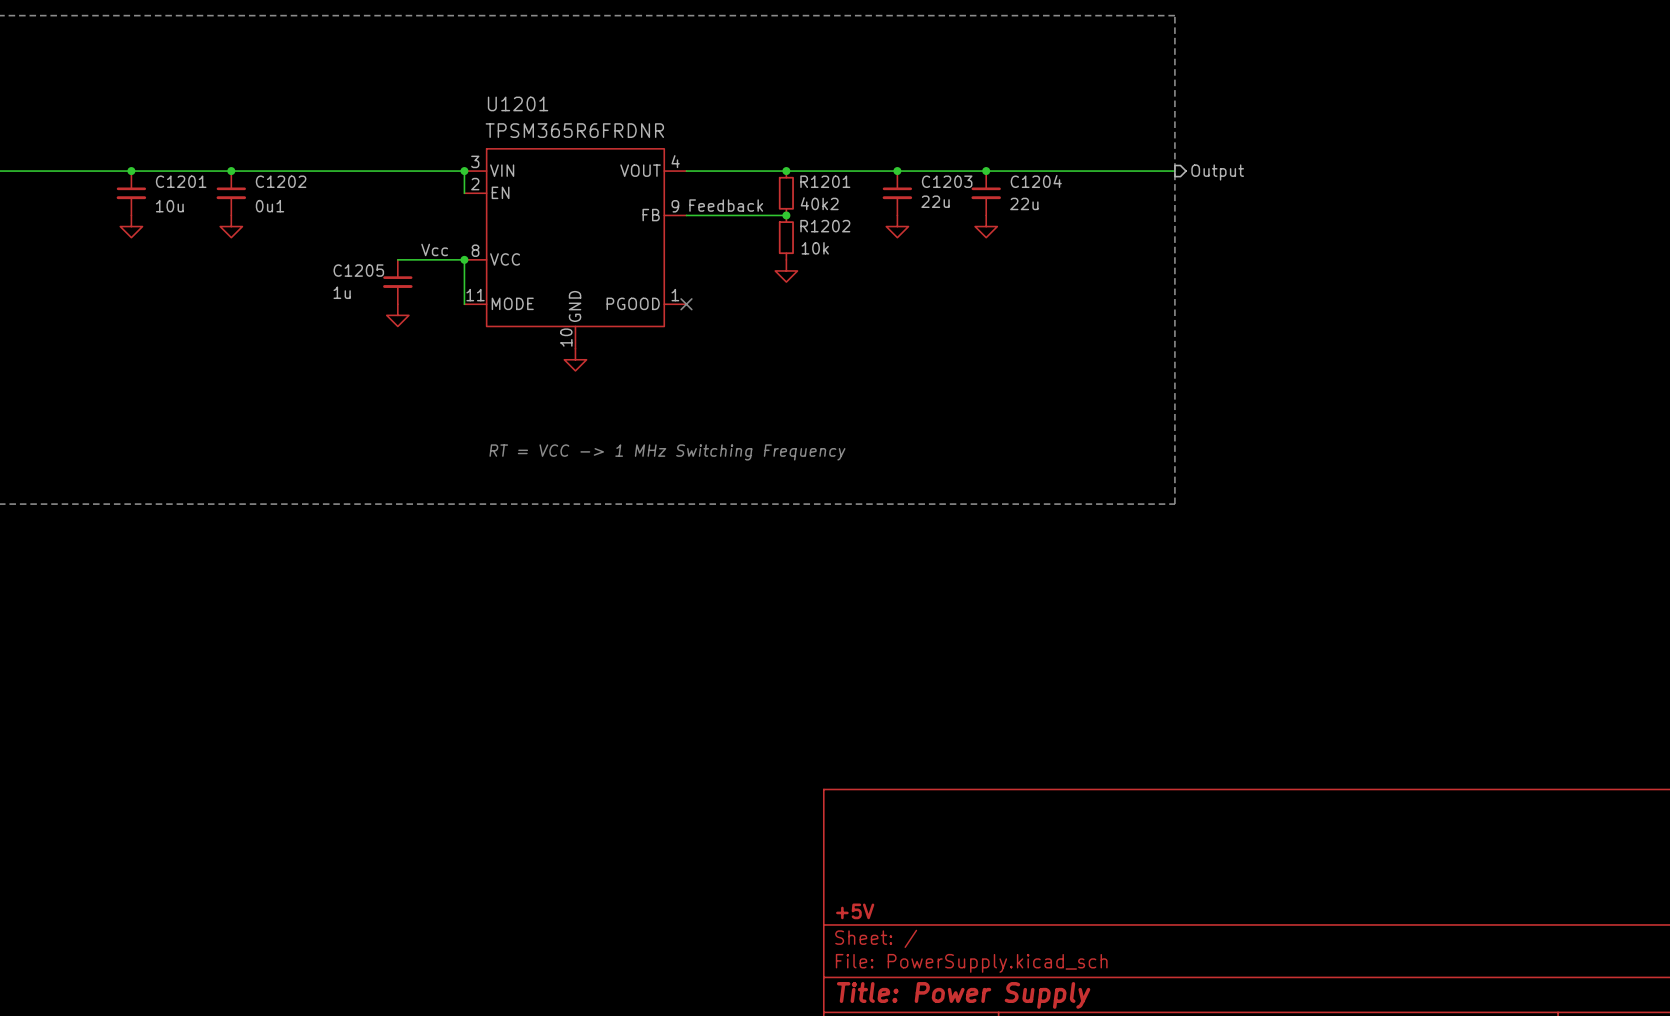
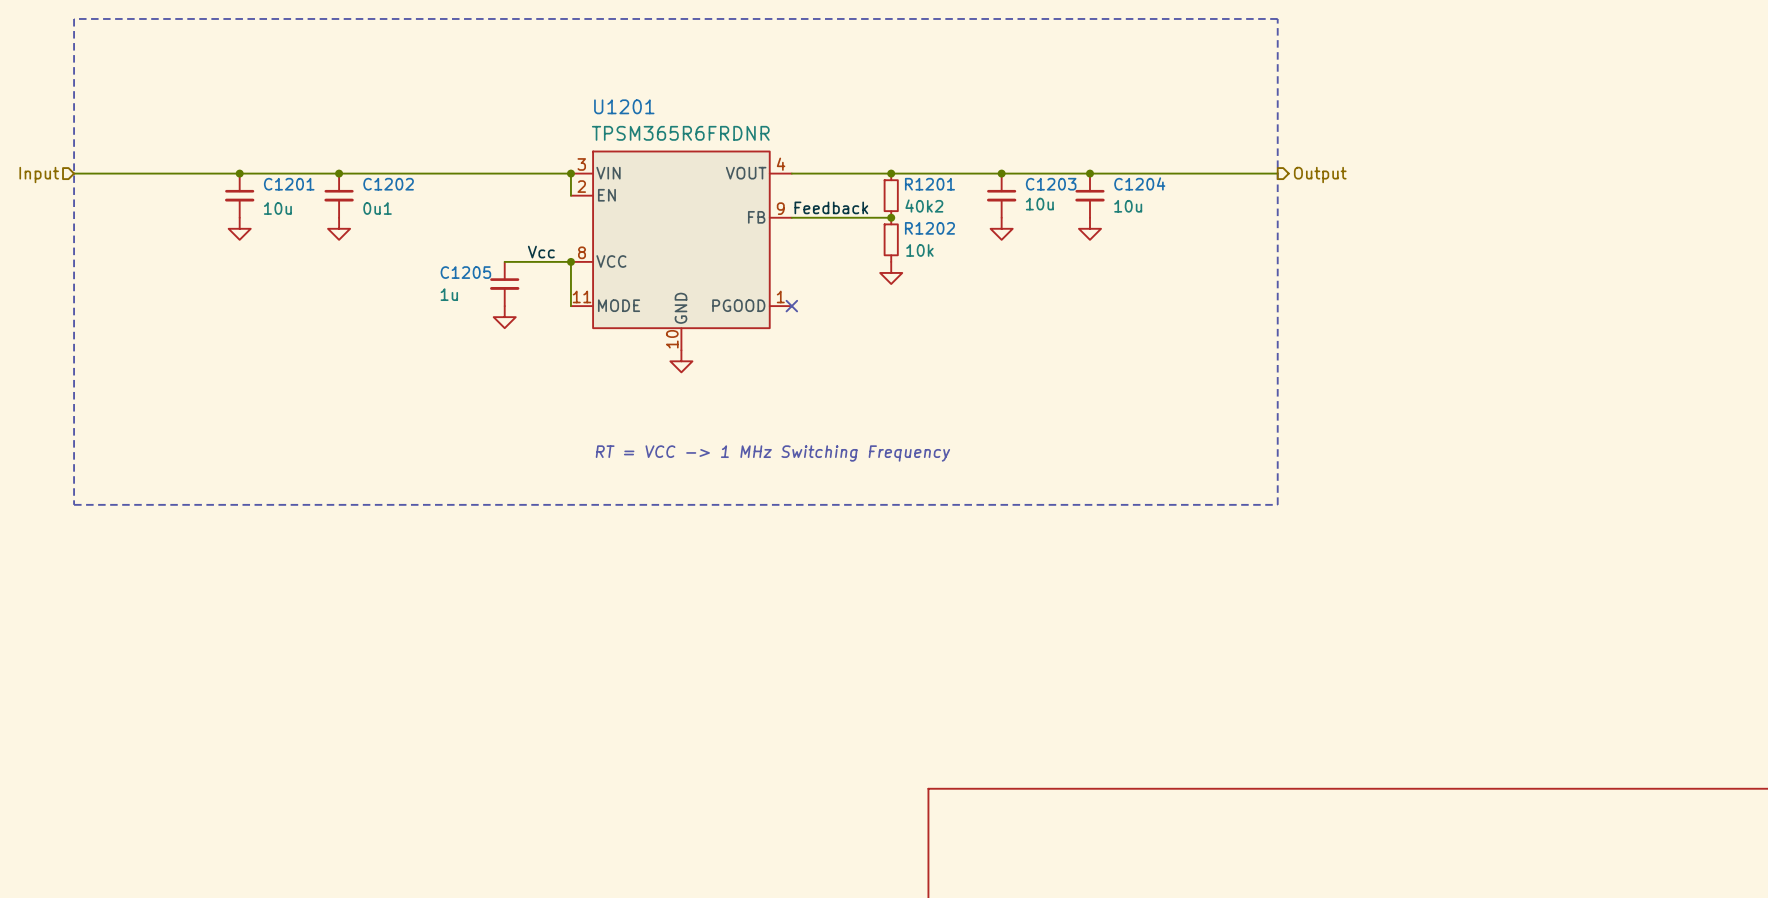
C1203 value: 22u (935, 201) -> 10u (1039, 204)
C1204 value: 22u (1024, 203) -> 10u (1128, 206)

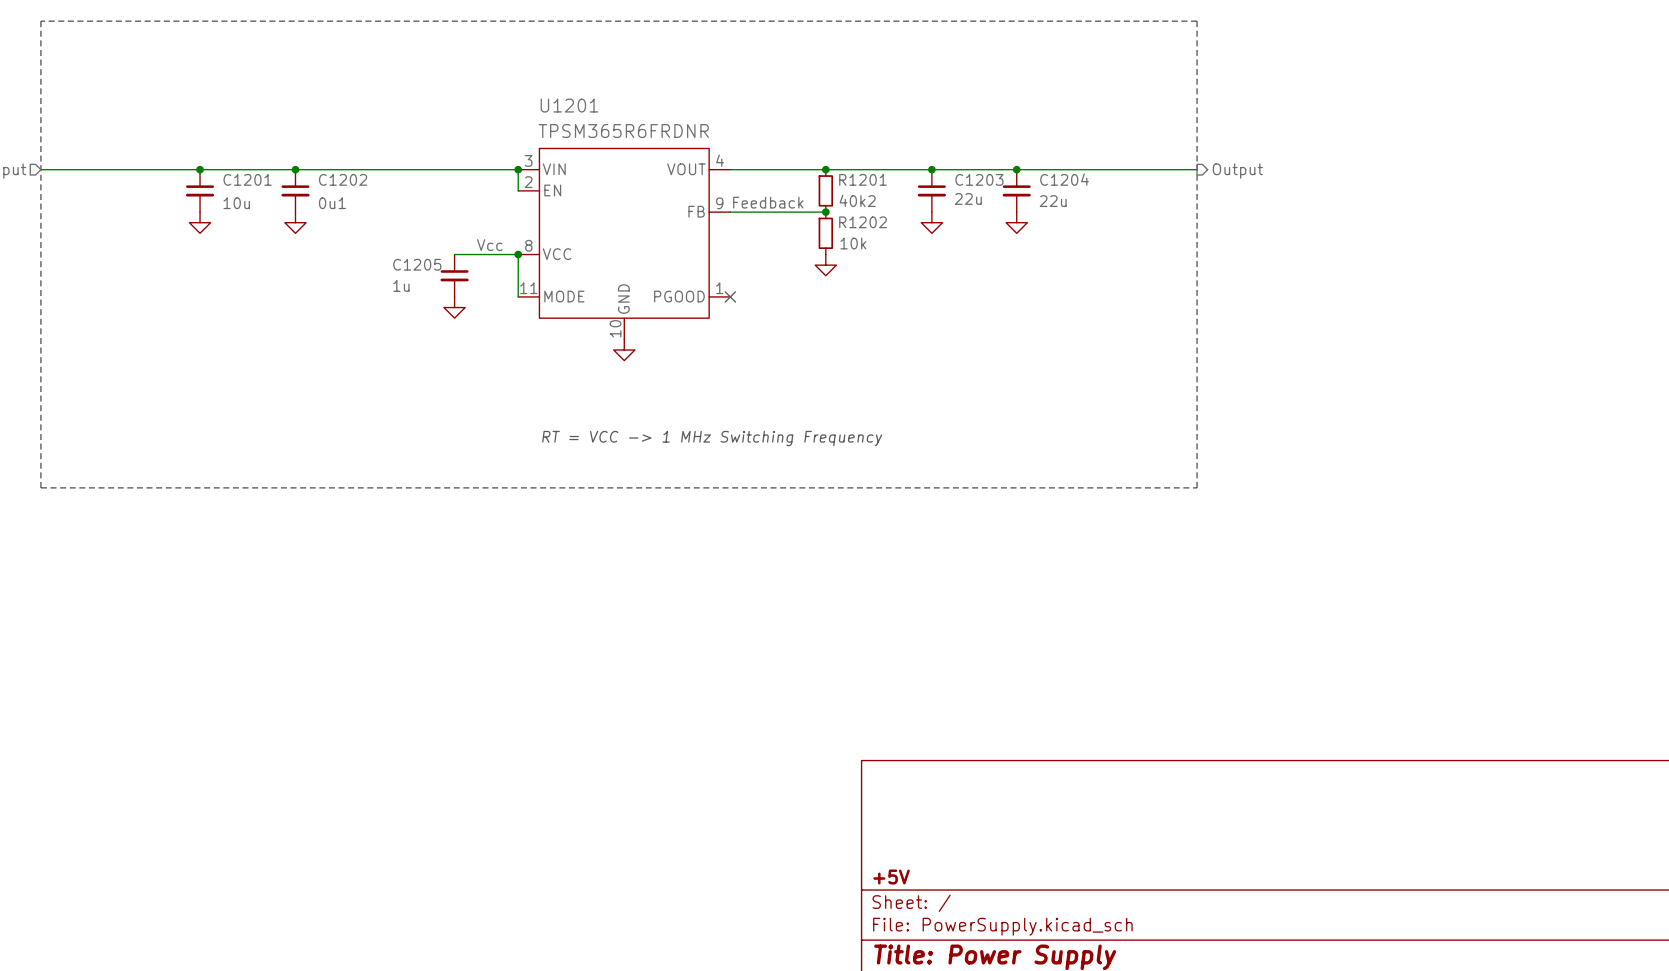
C1203 value: 10u (1039, 204) -> 22u (968, 198)
C1204 value: 10u (1128, 206) -> 22u (1053, 201)

